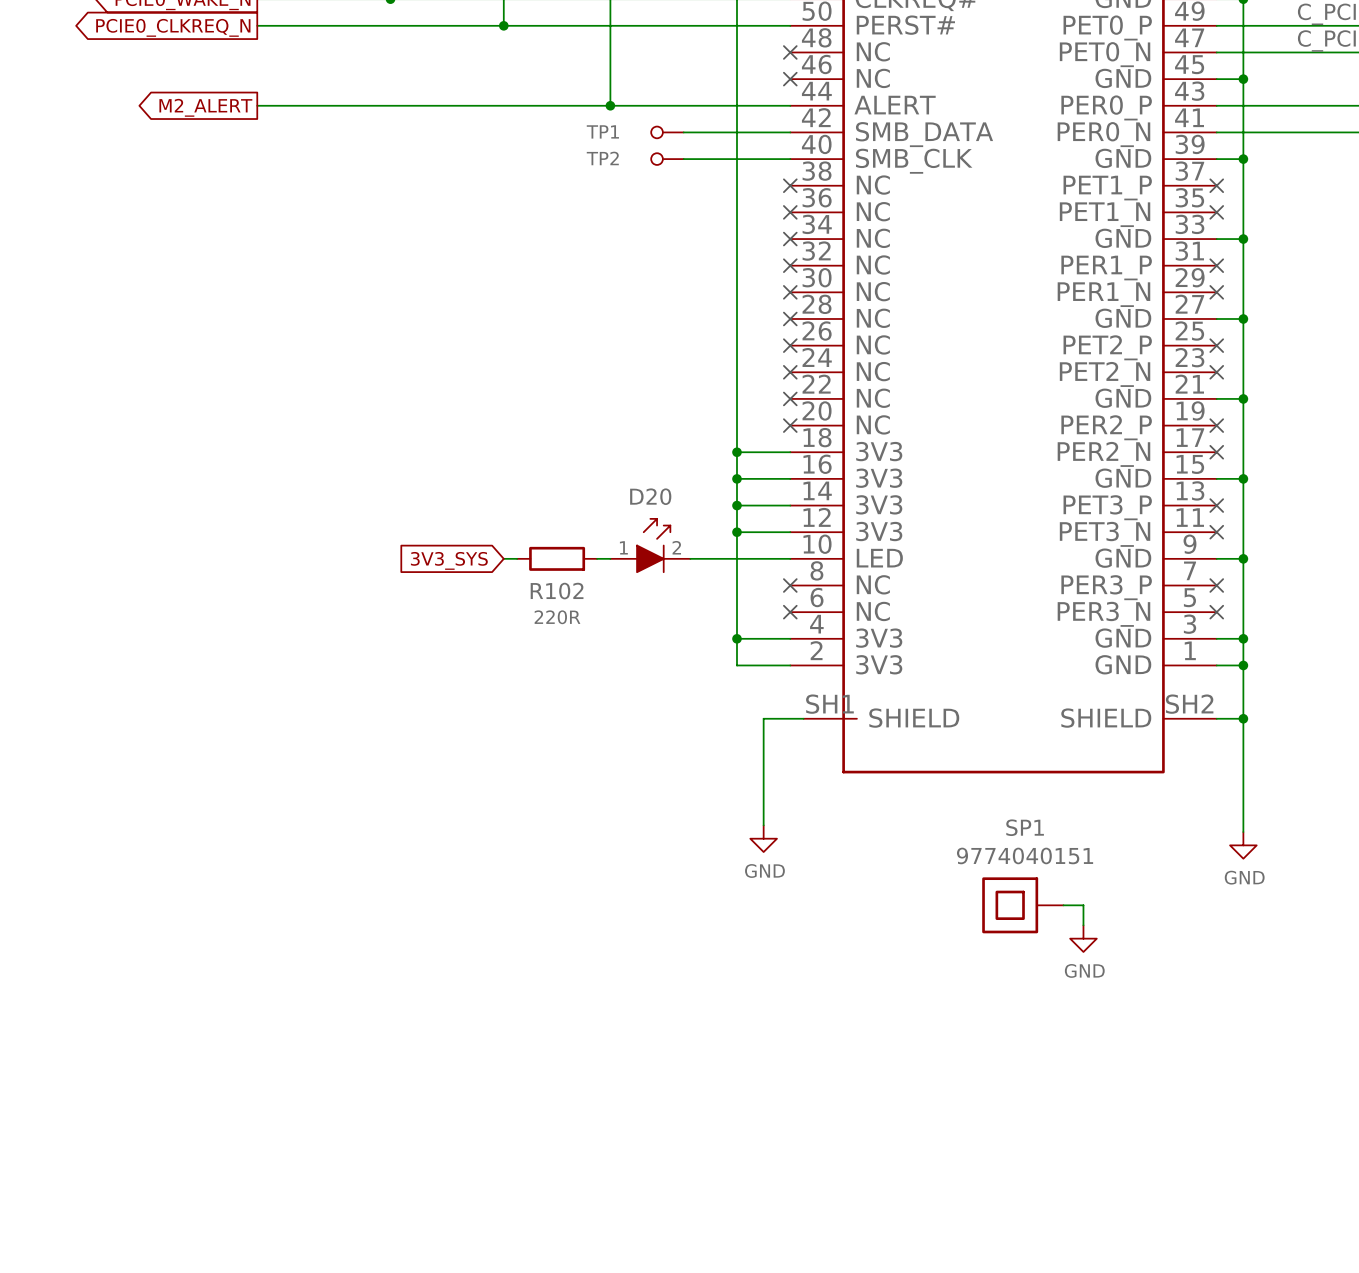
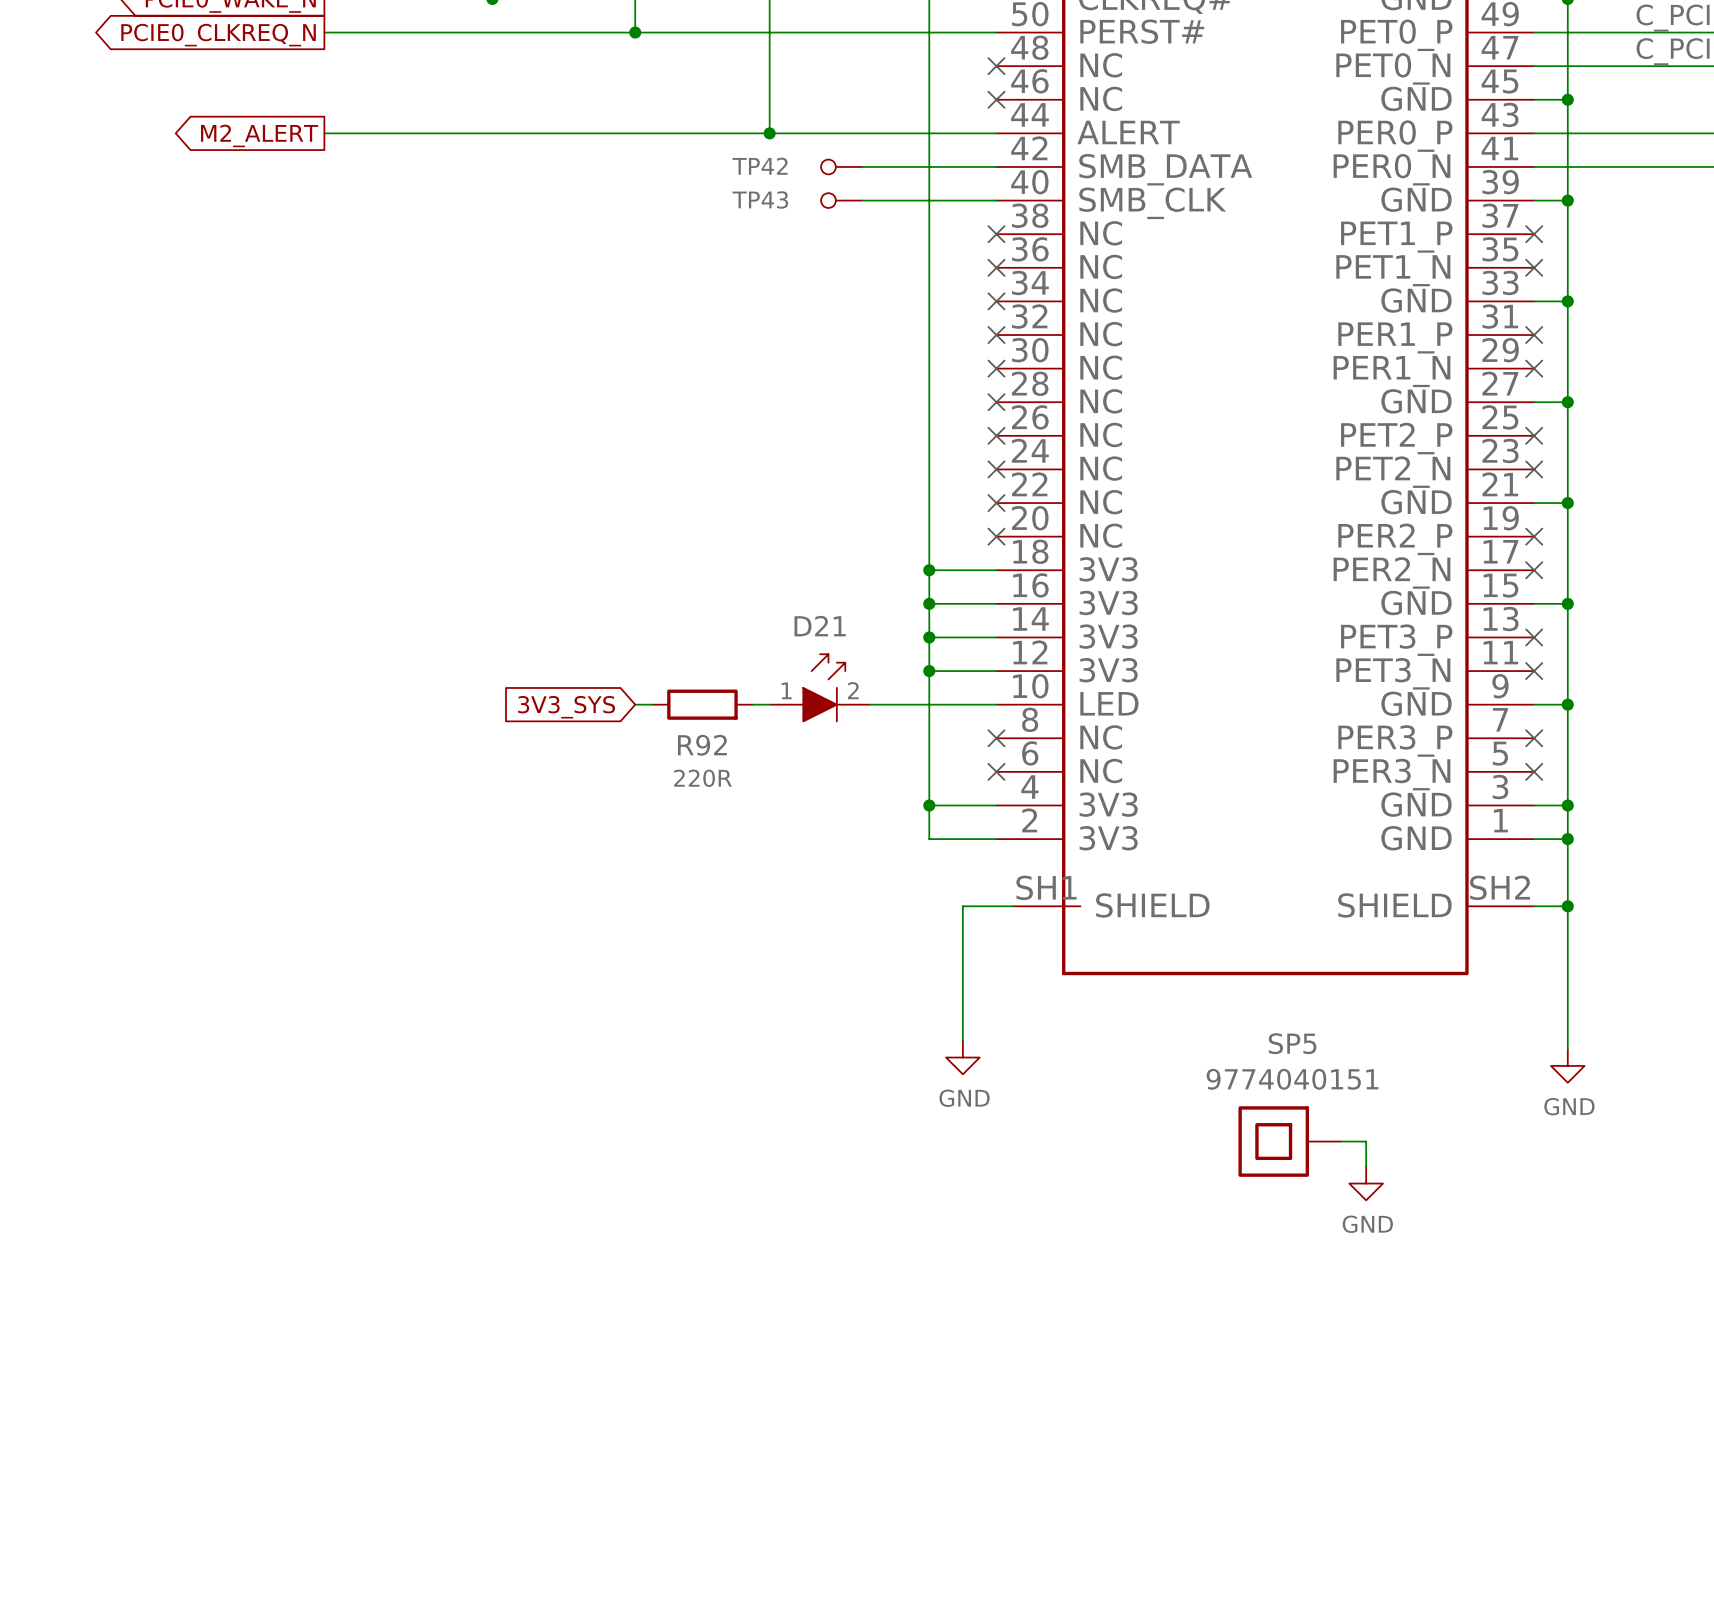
TP1 name: TP1 (602, 131) -> TP42 (760, 166)
TP2 name: TP2 (602, 158) -> TP43 (760, 199)
D20 name: D20 (650, 496) -> D21 (820, 626)
R102 name: R102 (557, 591) -> R92 (702, 745)
SP1 name: SP1 (1025, 827) -> SP5 (1292, 1043)

